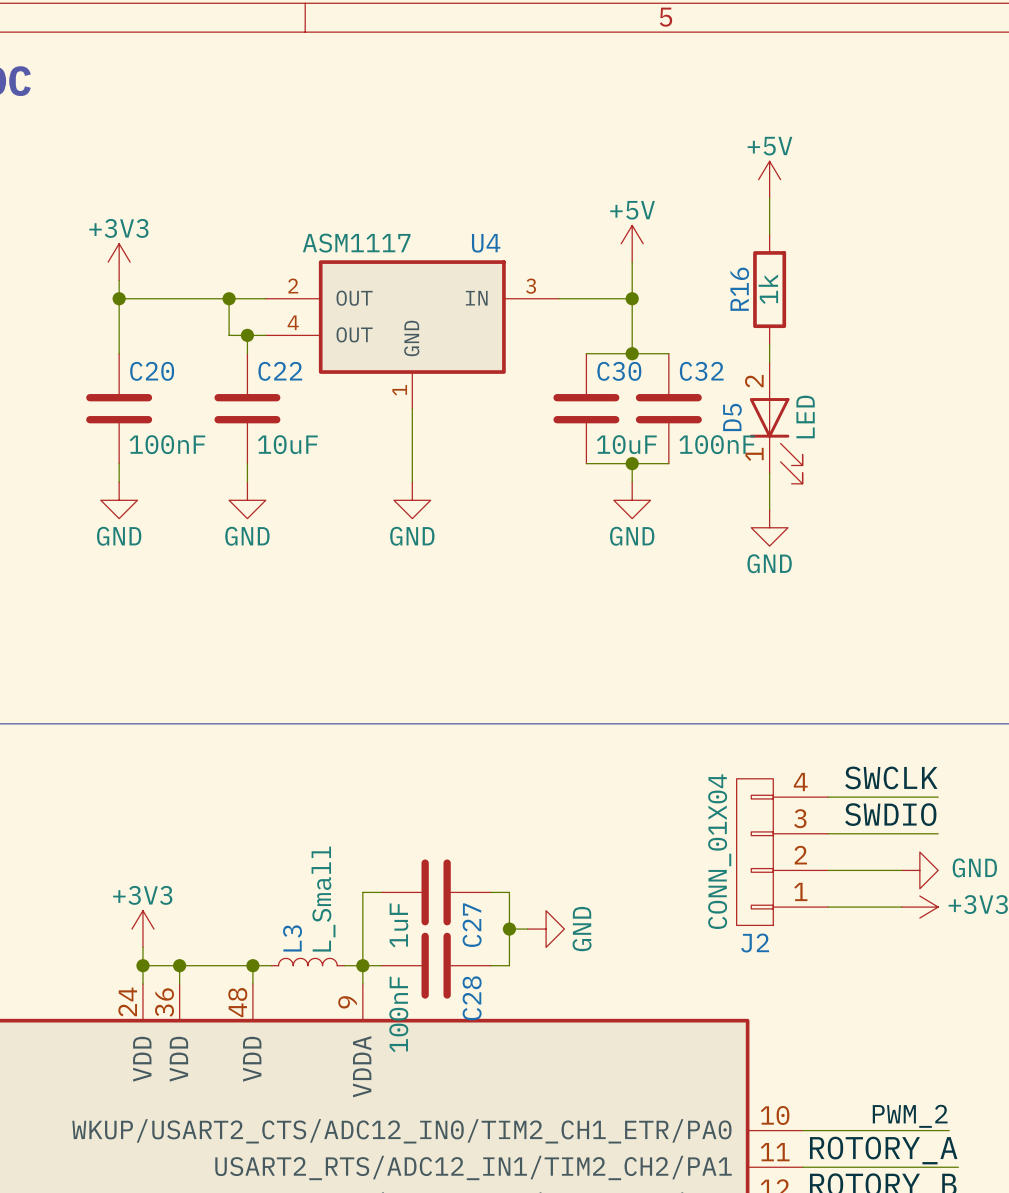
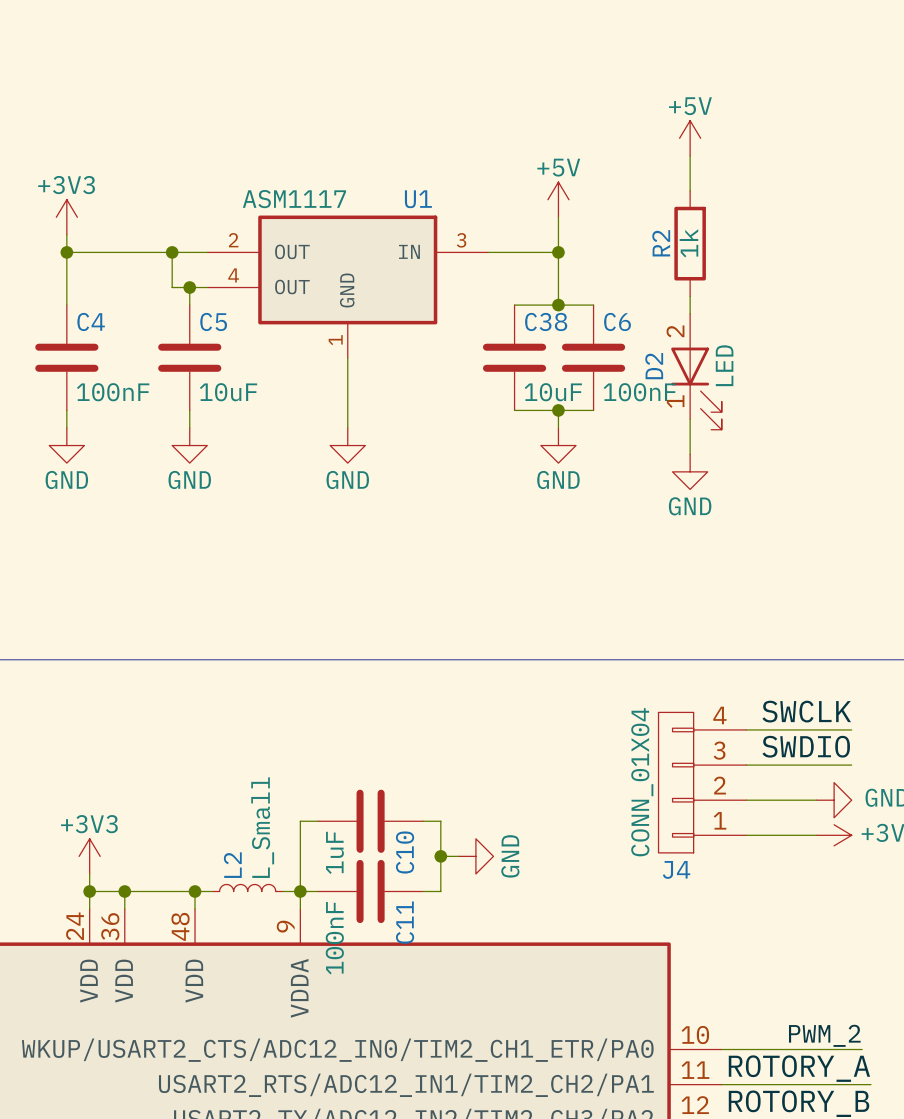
U4 name: U4 (486, 243) -> U1 (418, 199)
R16 name: R16 (739, 289) -> R2 (661, 243)
C20 name: C20 (152, 371) -> C4 (91, 321)
C22 name: C22 (280, 371) -> C5 (213, 321)
C30 name: C30 (619, 371) -> C38 (546, 321)
C32 name: C32 (701, 371) -> C6 (617, 321)
D5 name: D5 (732, 417) -> D2 (654, 366)
C27 name: C27 (472, 925) -> C10 (405, 852)
L3 name: L3 (292, 938) -> L2 (232, 865)
J2 name: J2 (755, 943) -> J4 (676, 869)
C28 name: C28 (472, 998) -> C11 (405, 922)

